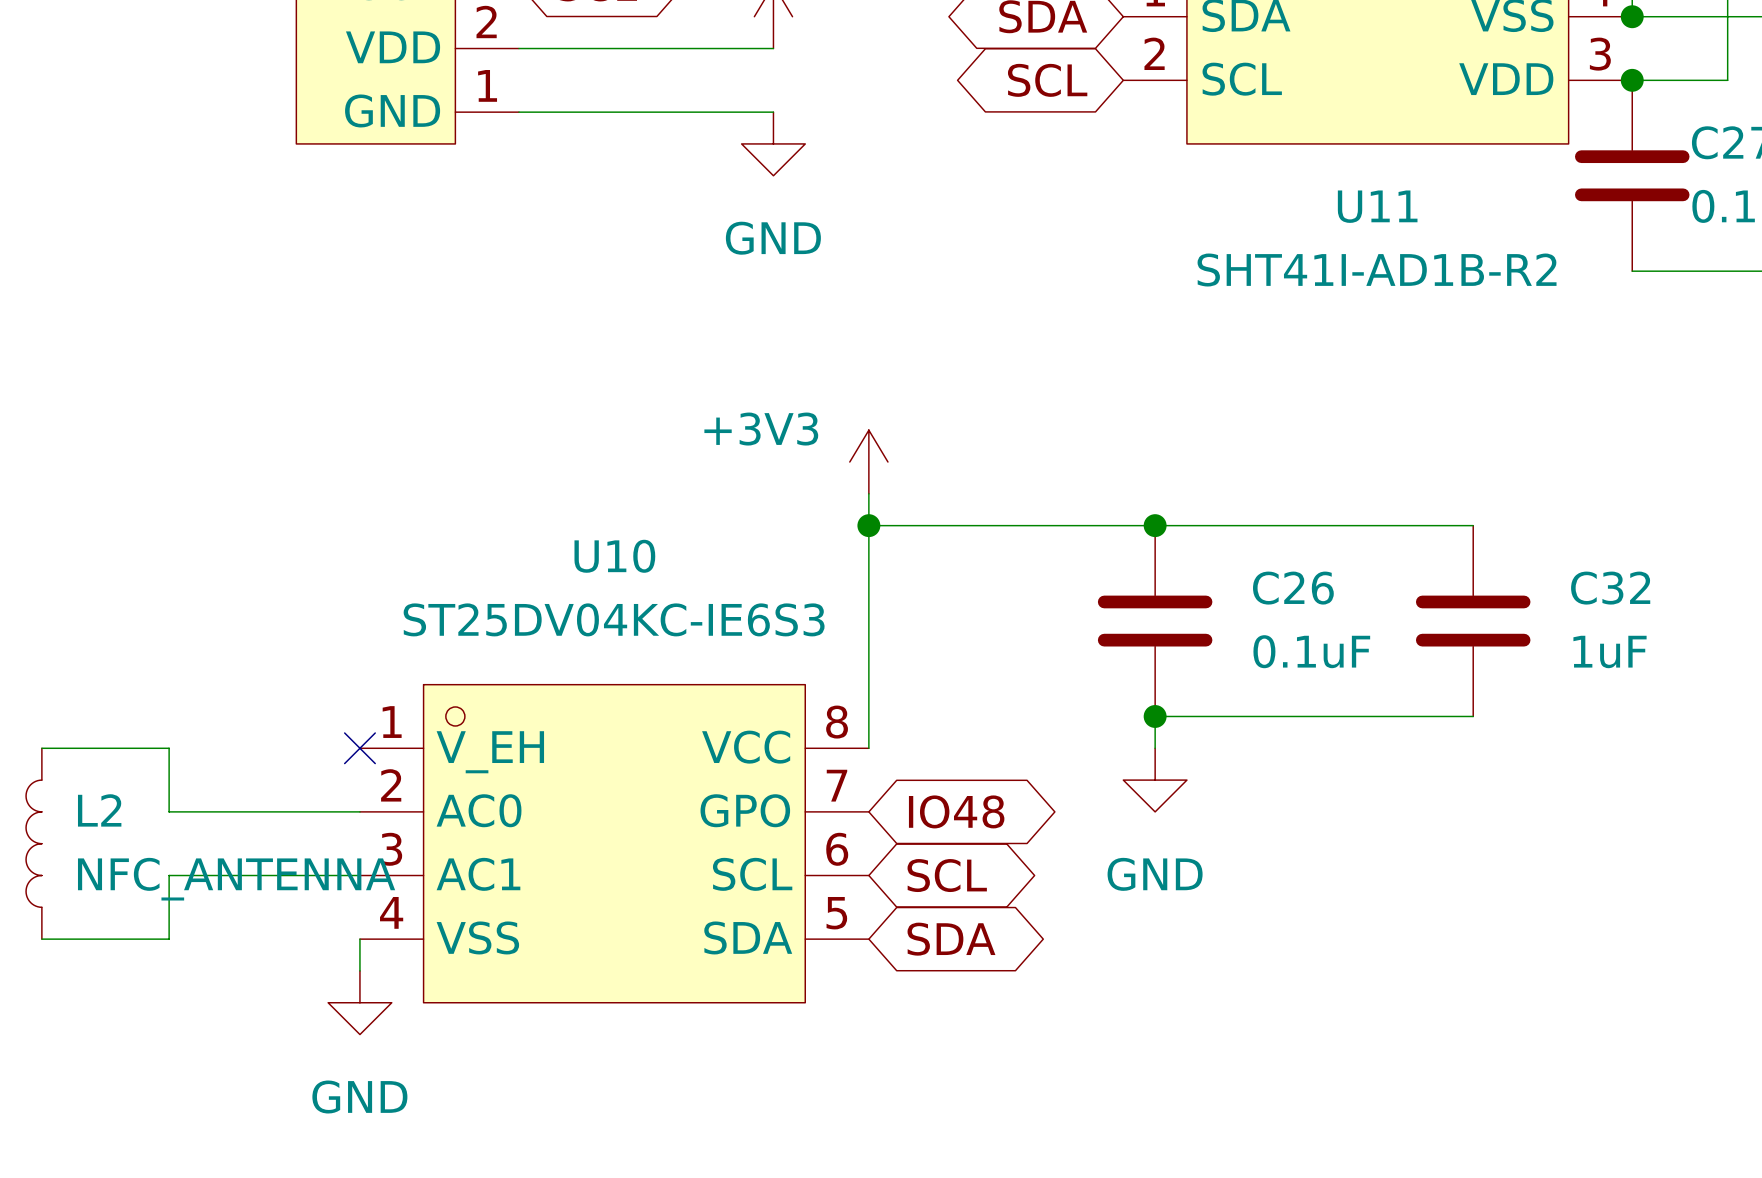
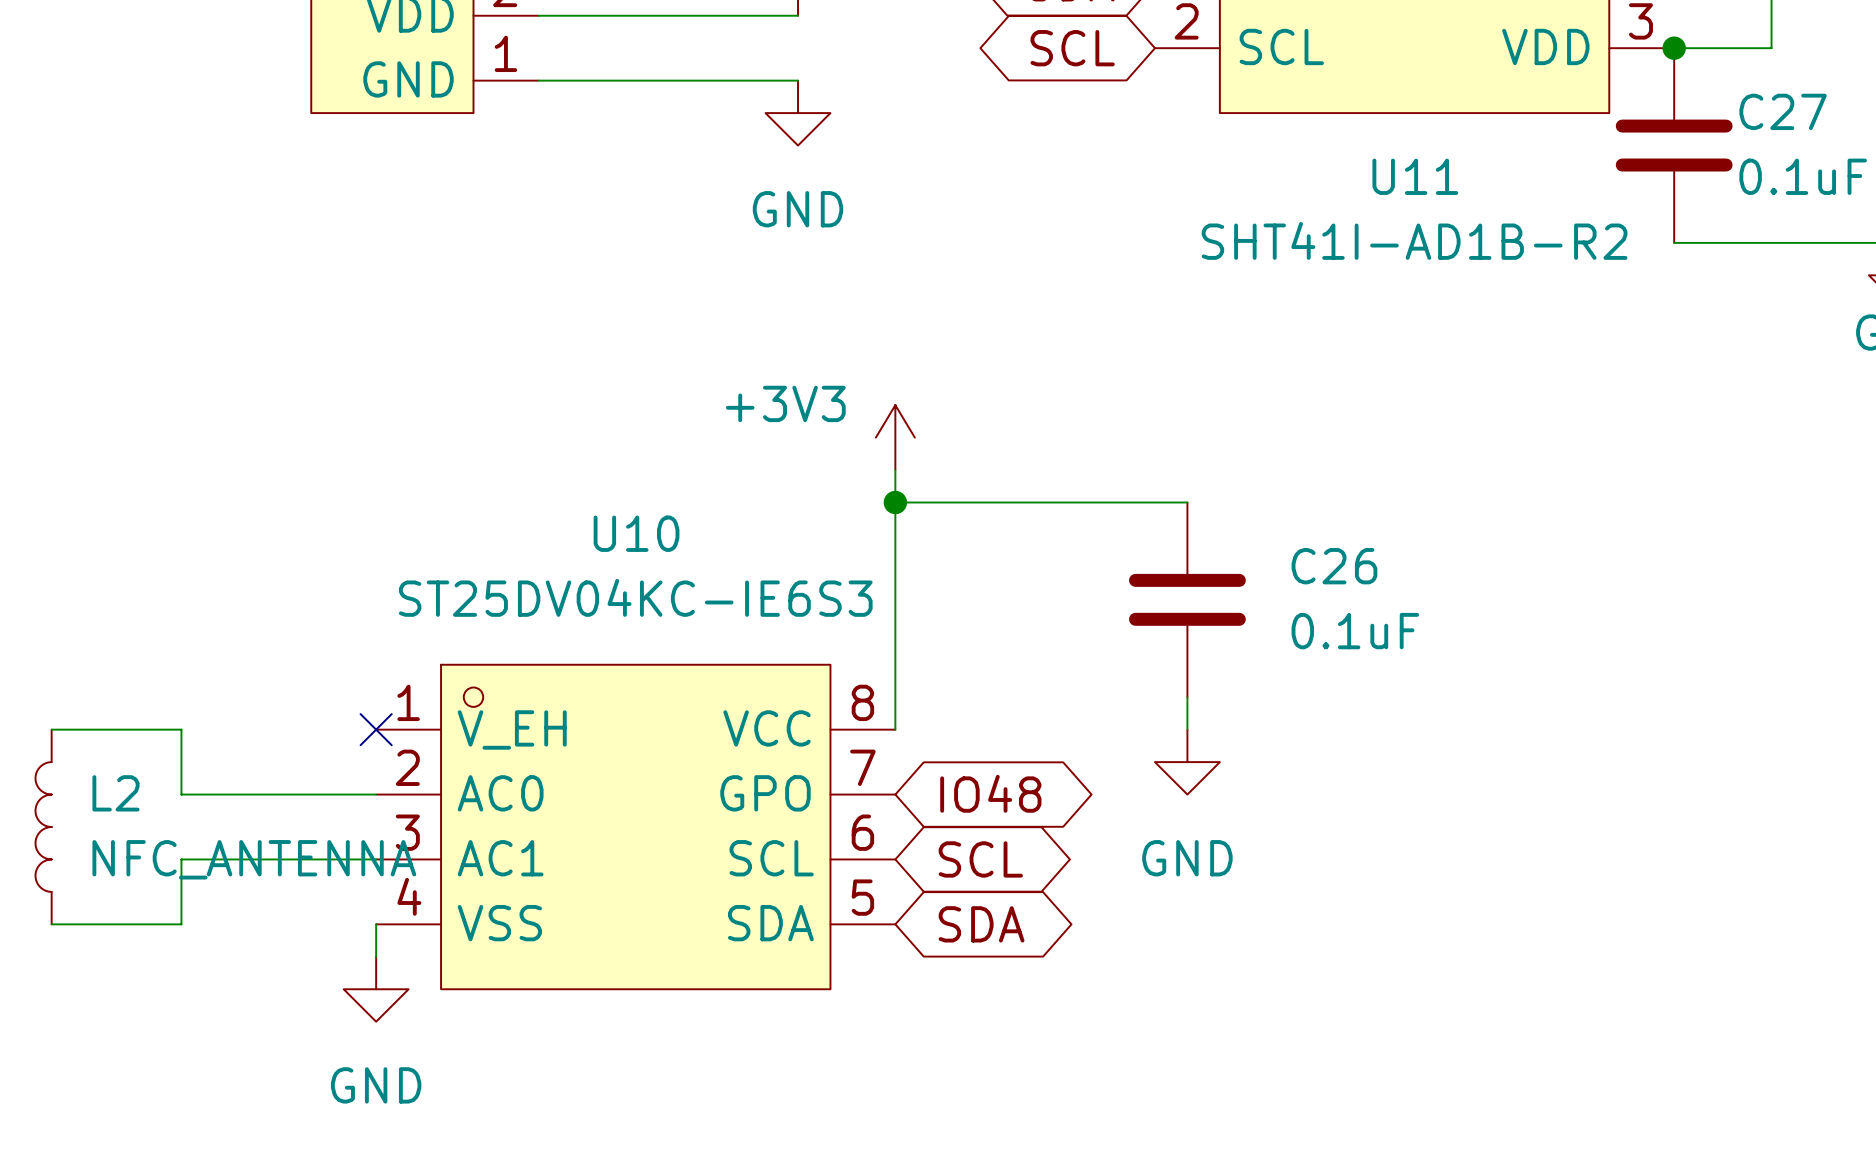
wire: (1155, 525) (1473, 525) -> none
junction: (1155, 525) -> none
C32: 1uF (1473, 621) -> none
wire: (1155, 716) (1473, 716) -> none
junction: (1155, 716) -> none

